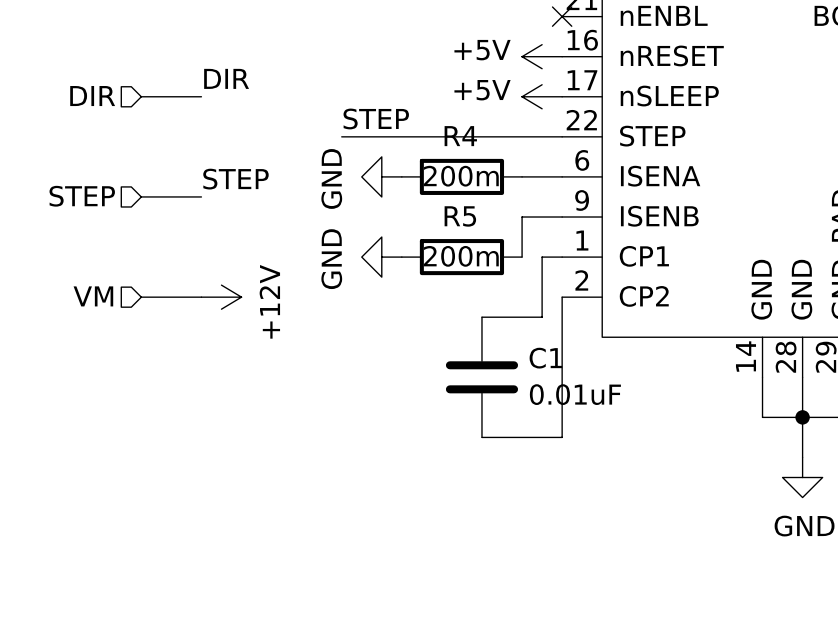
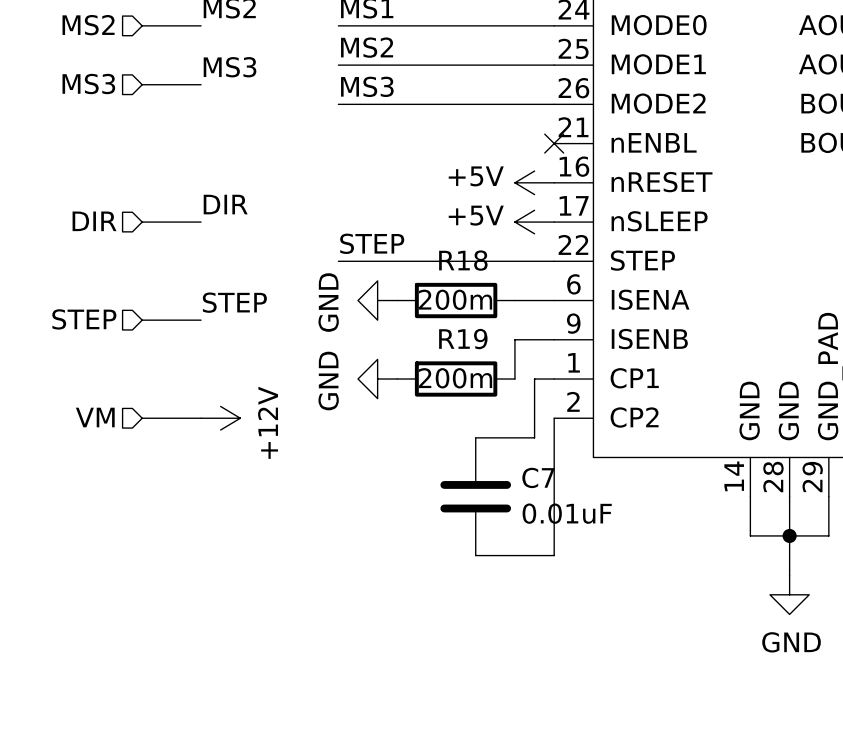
R4 name: R4 (460, 136) -> R18 (463, 260)
R5 name: R5 (460, 216) -> R19 (463, 339)
C1 name: C1 (545, 358) -> C7 (538, 477)

